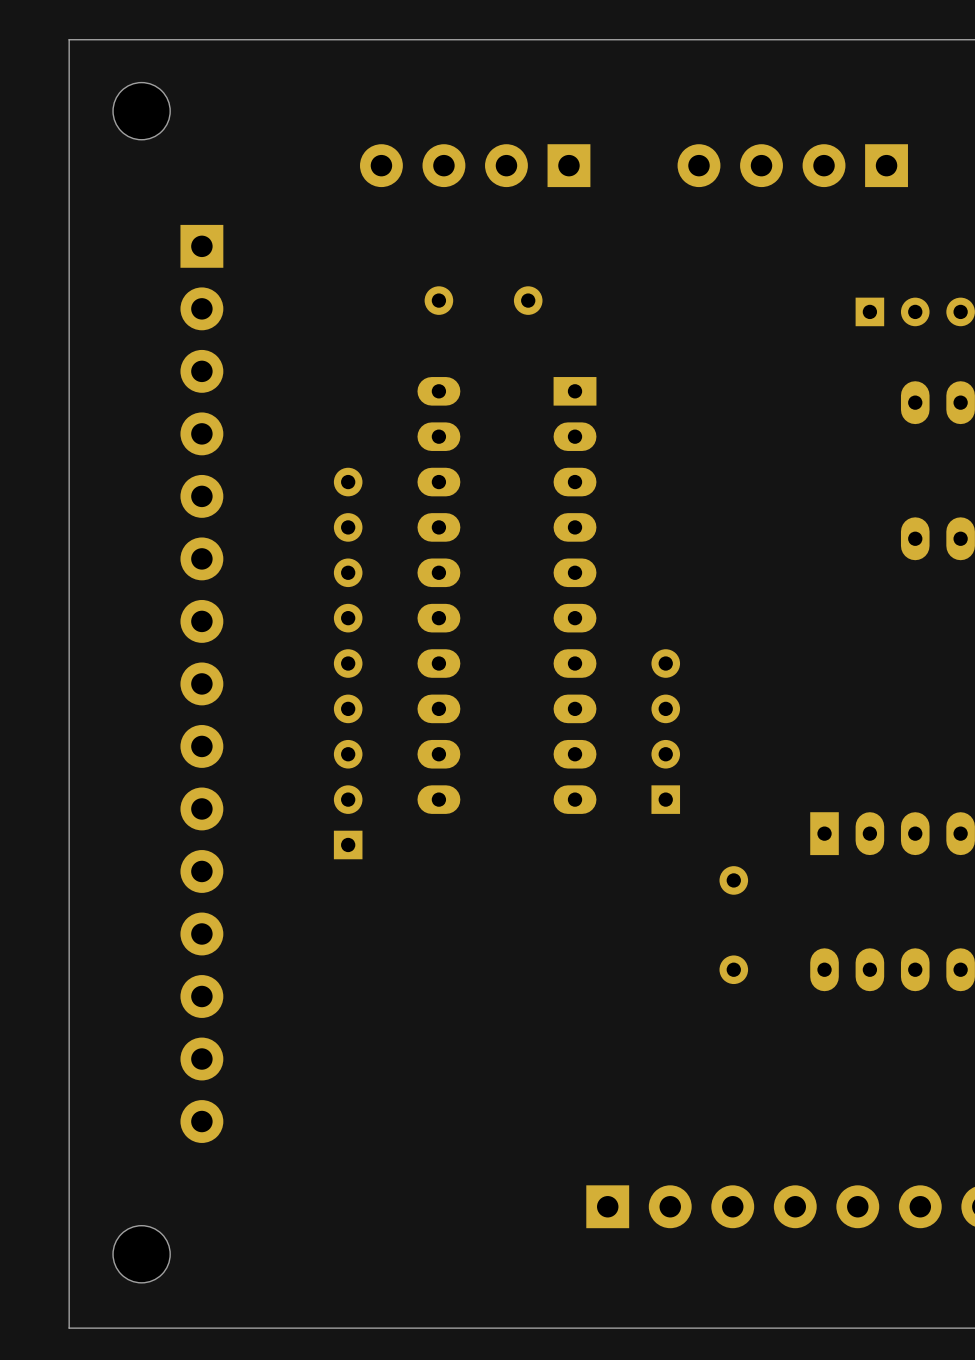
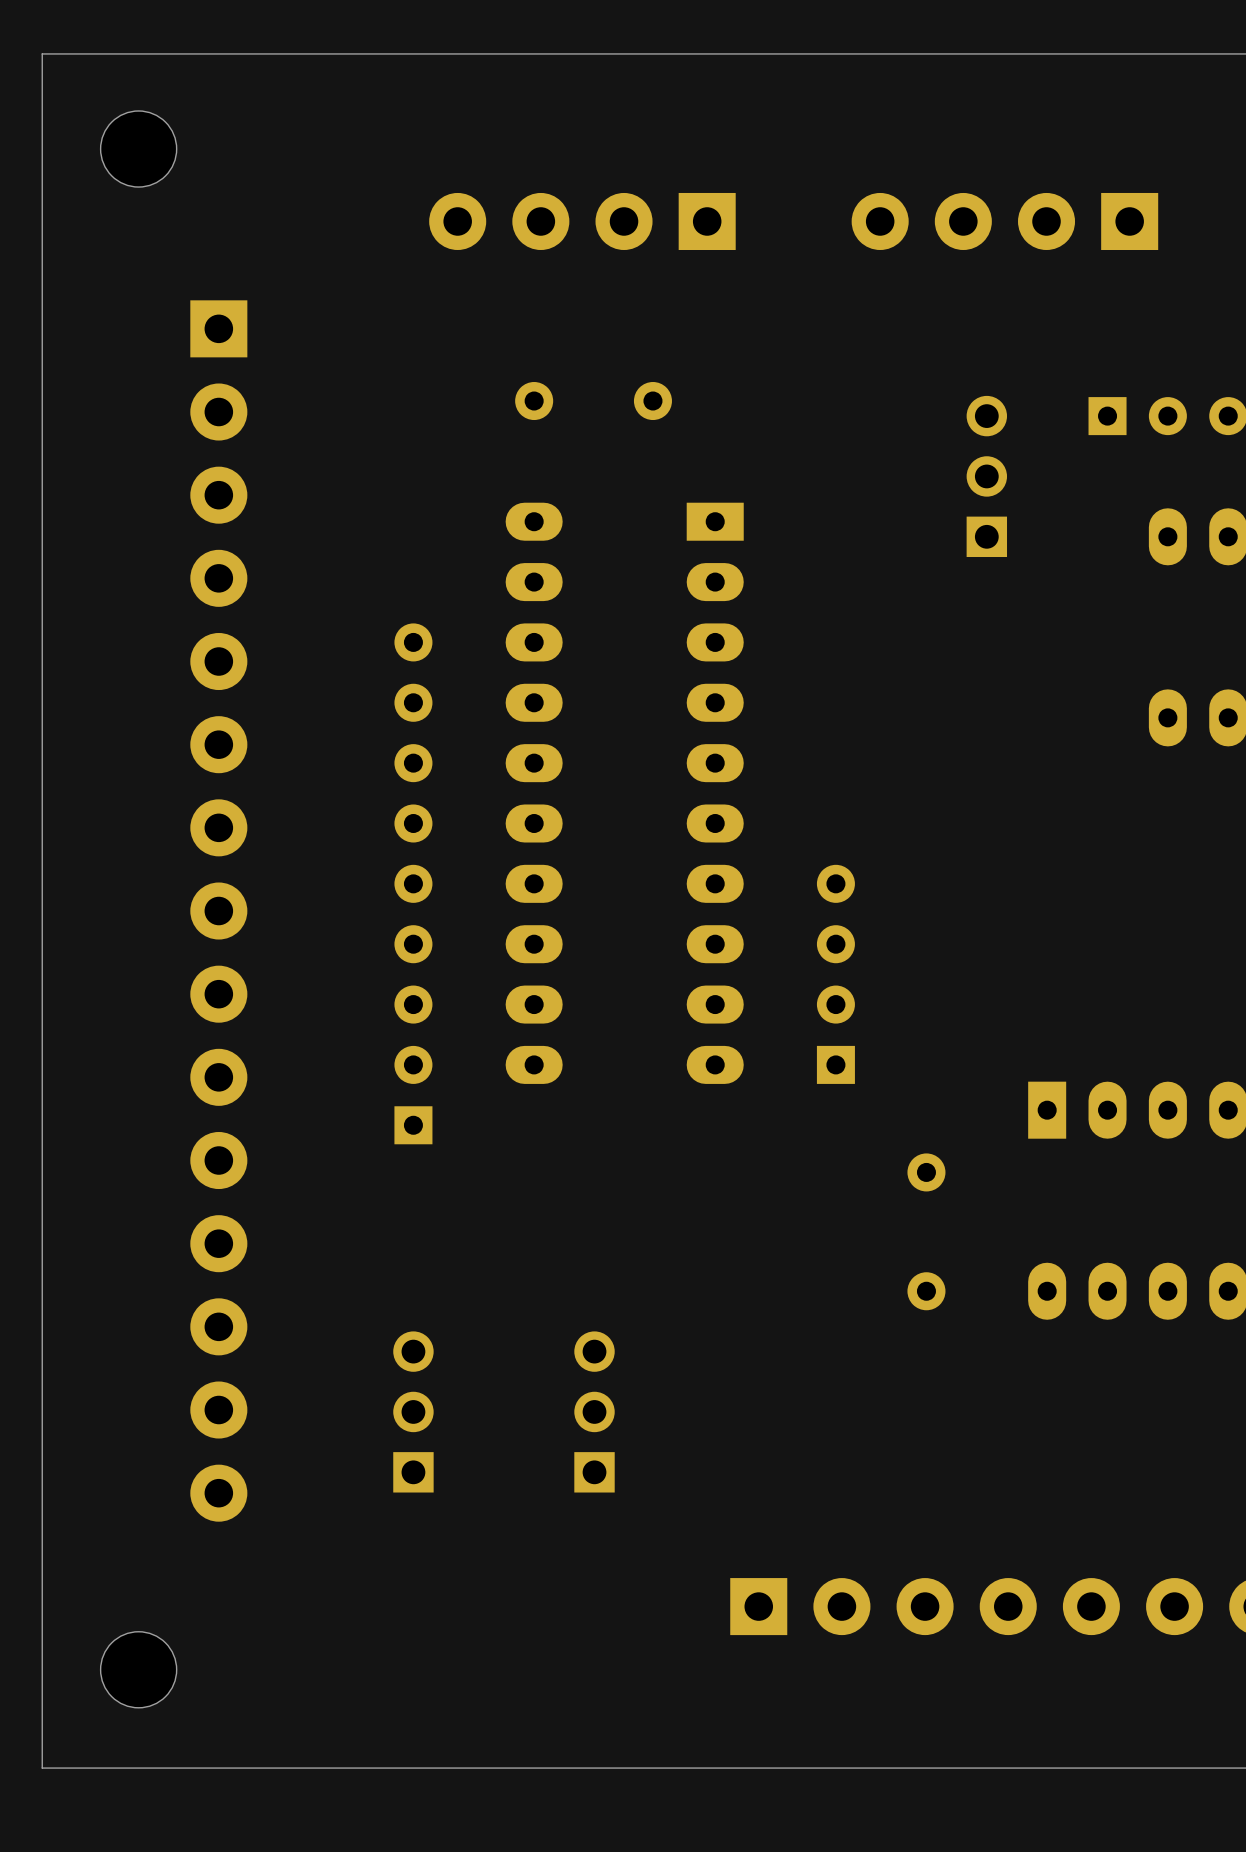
part: none -> (986, 476)
part: none -> (413, 1411)
part: none -> (594, 1411)

